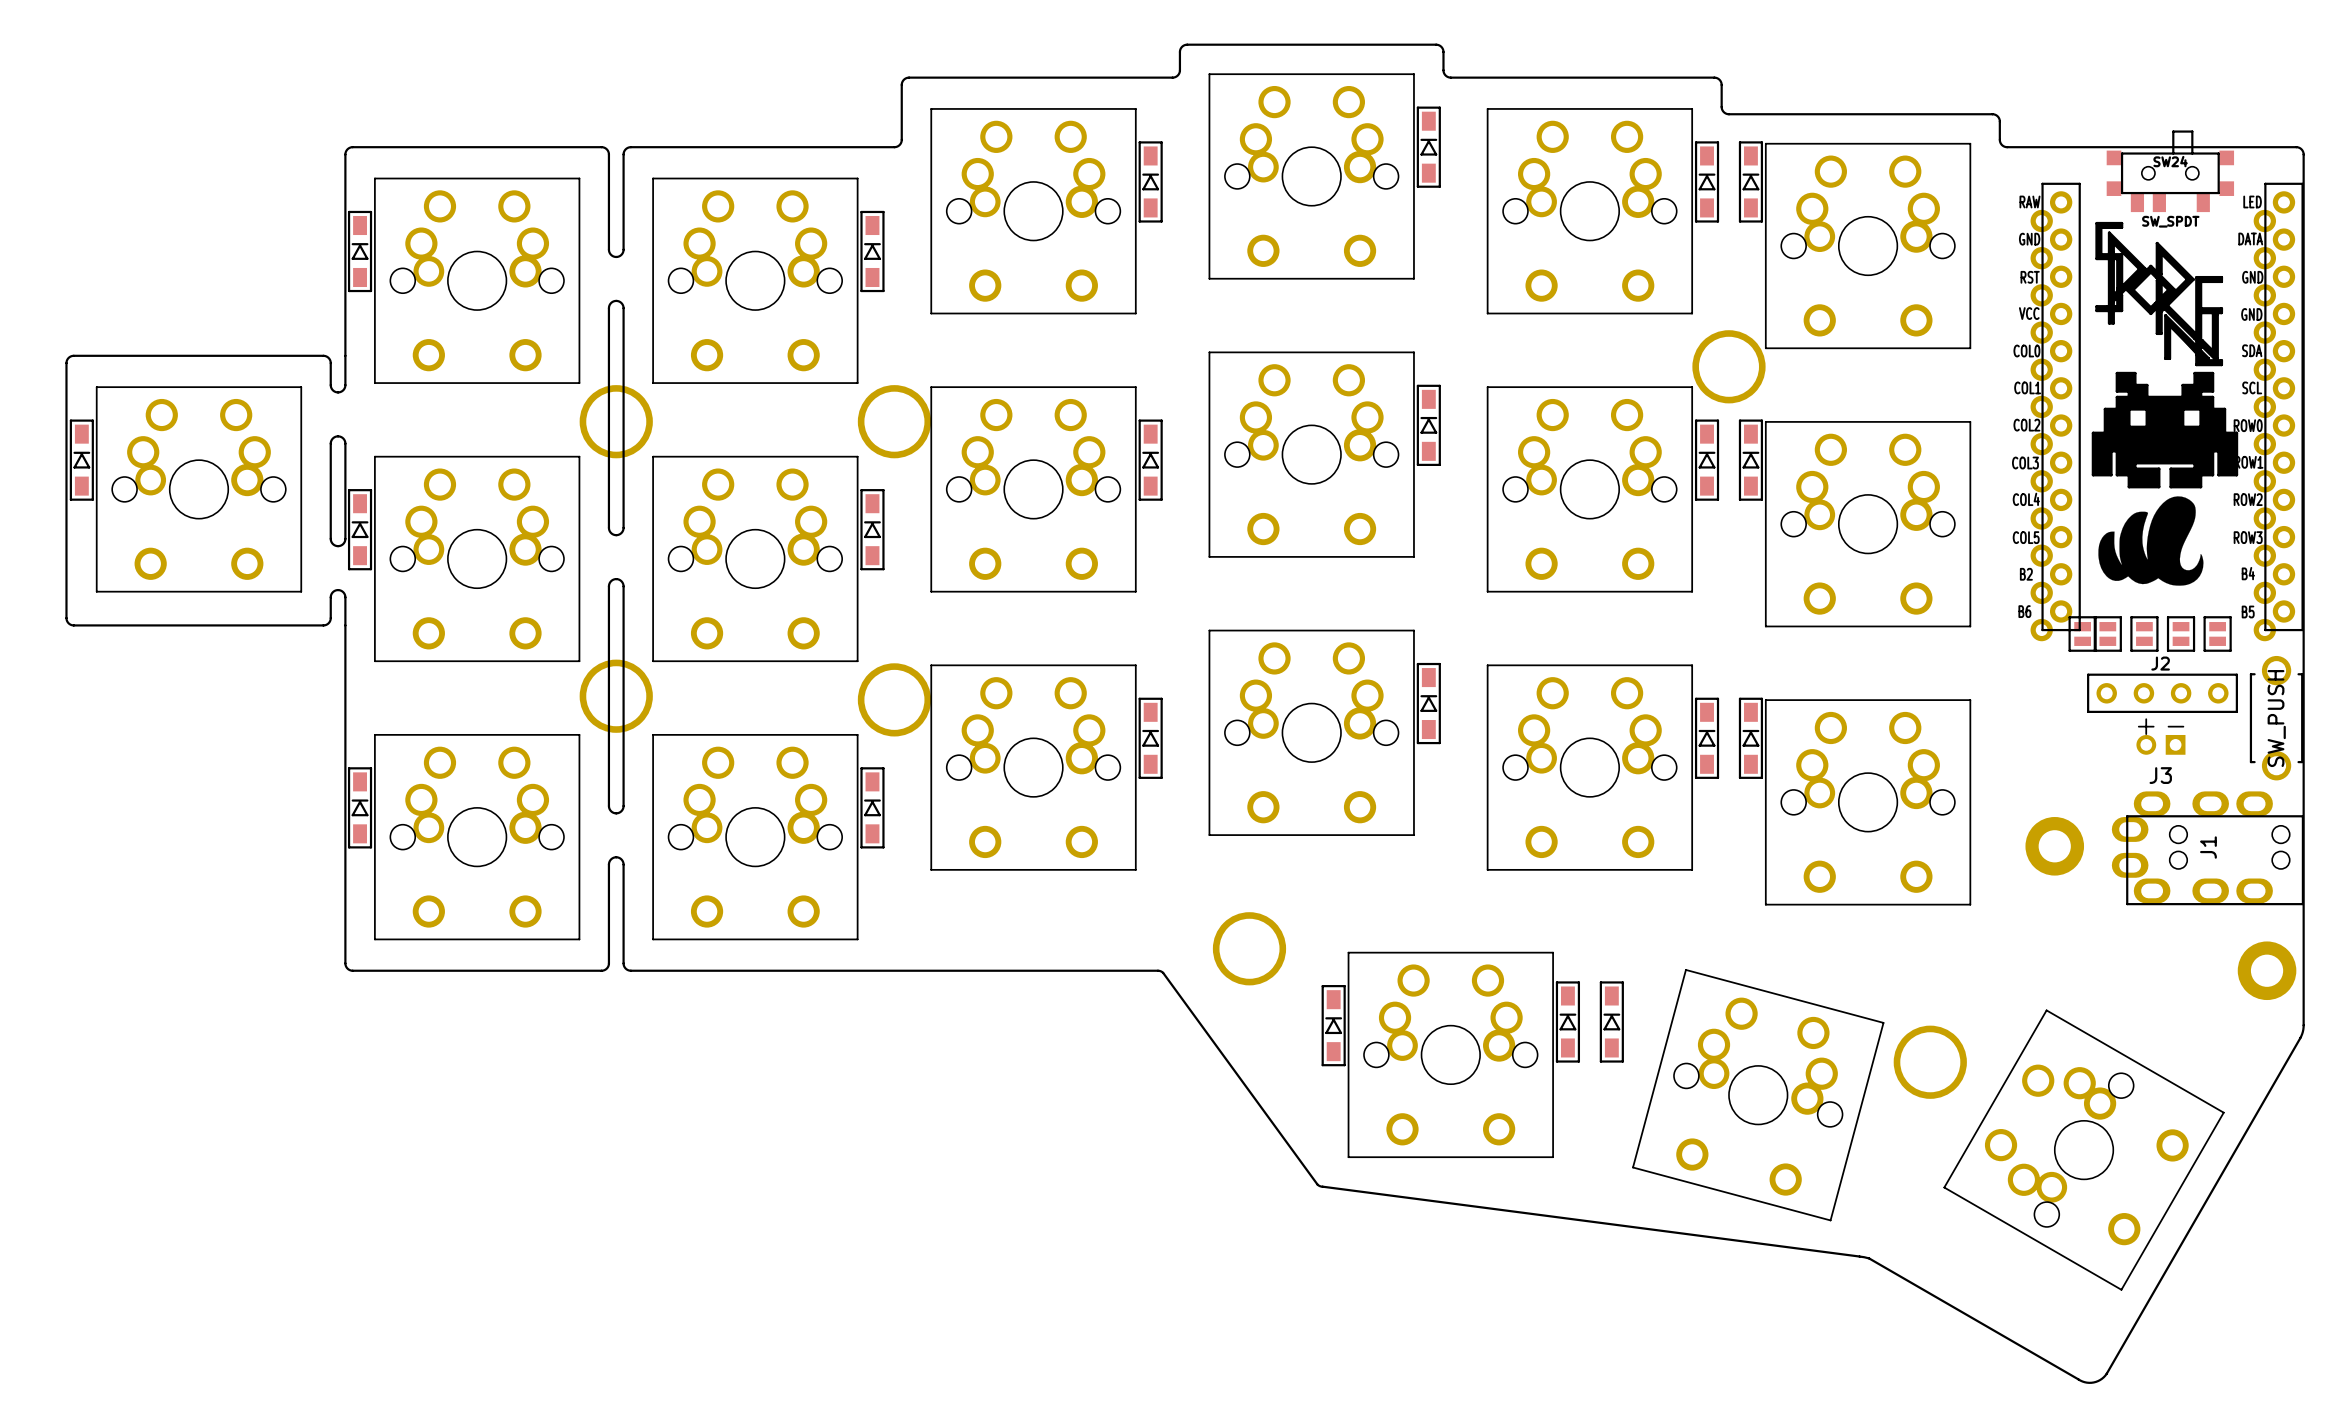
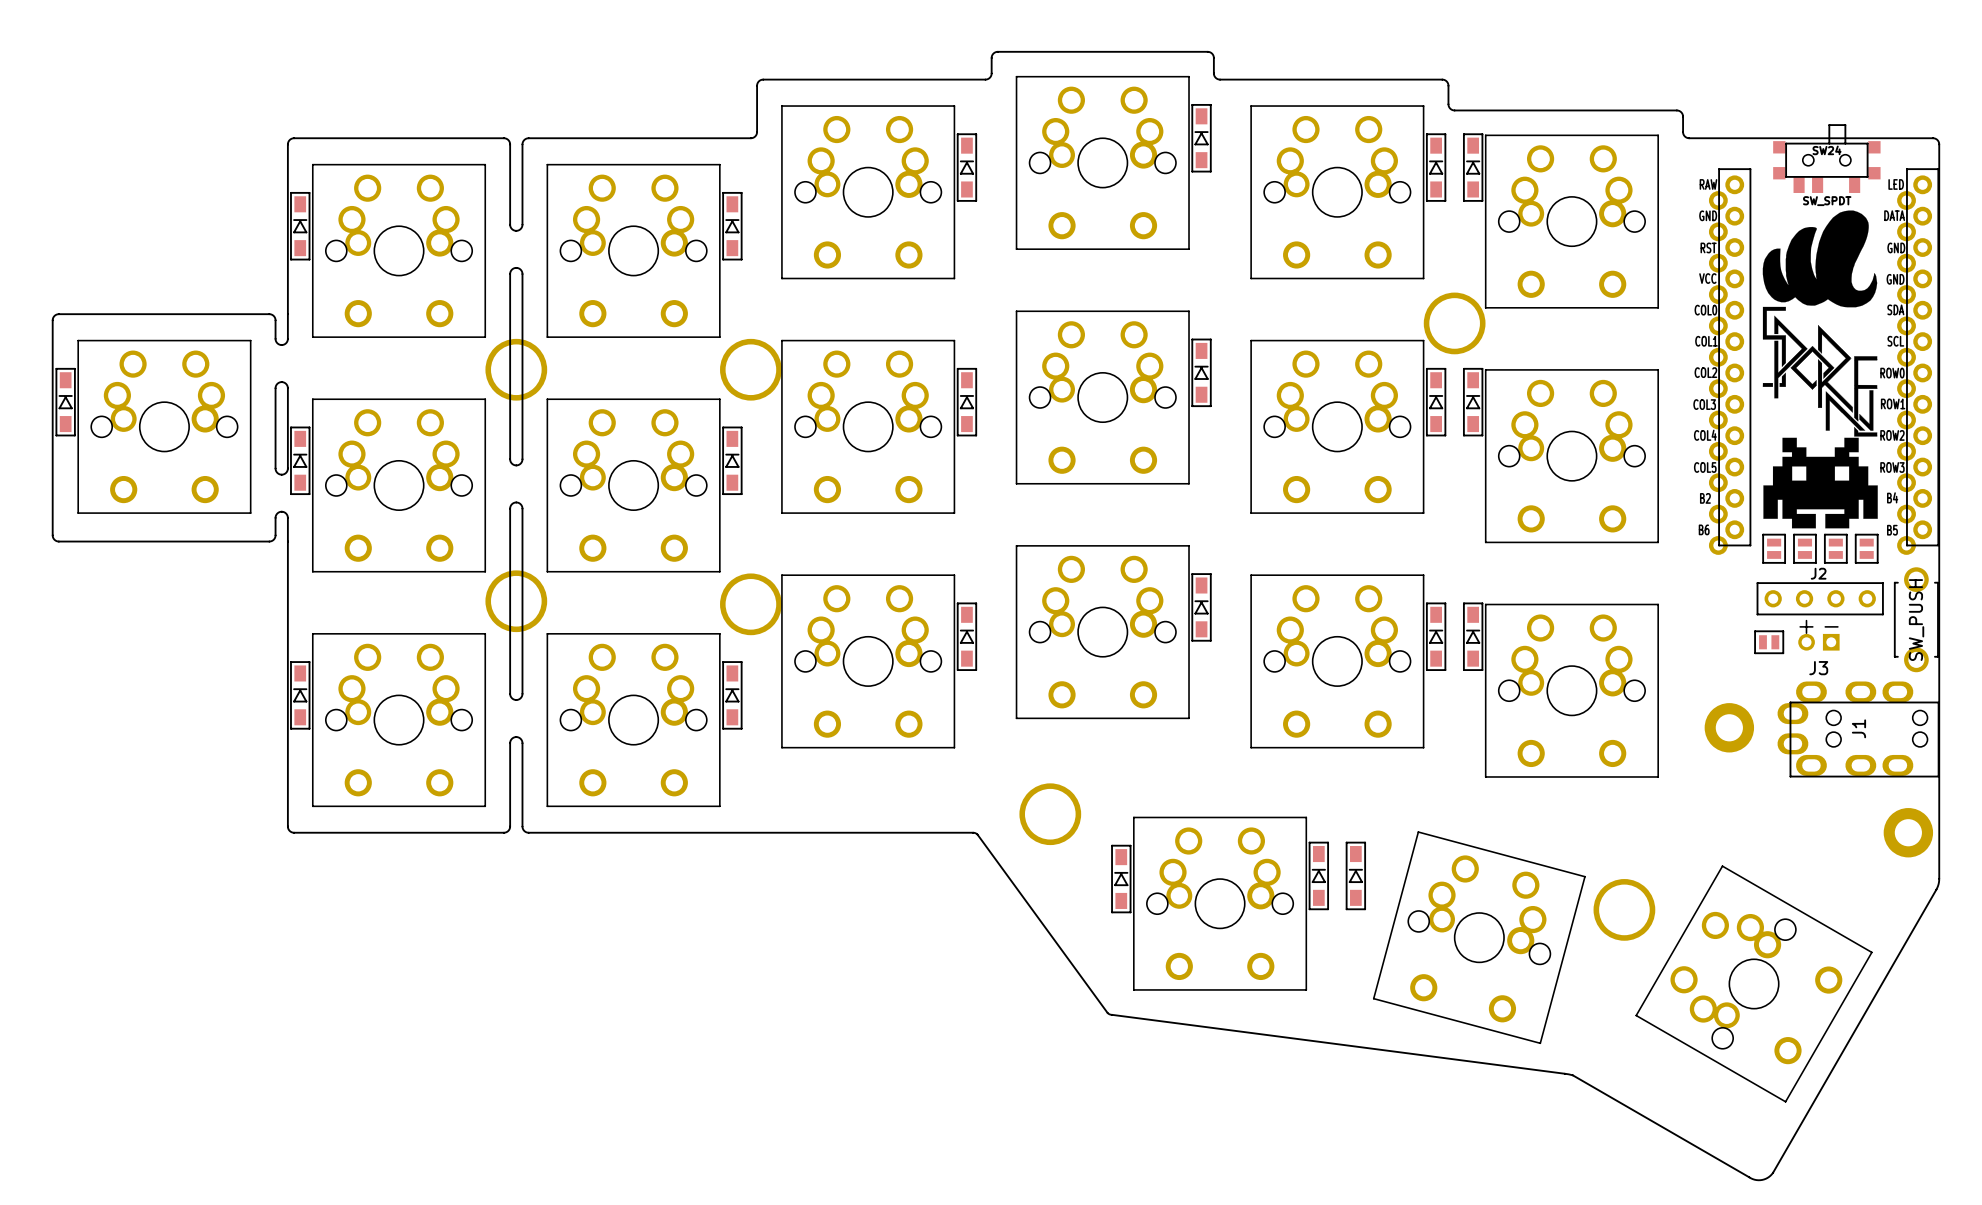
drawing: [2095, 221, 2224, 367] -> none
drawing: none -> [1762, 210, 1878, 529]
part: (2164, 430) -> none
drawing: [2098, 496, 2204, 586] -> none
part rotation: 0° (2082, 633) -> 90° clockwise (1769, 642)
part position: (2082, 633) -> (1769, 642)

